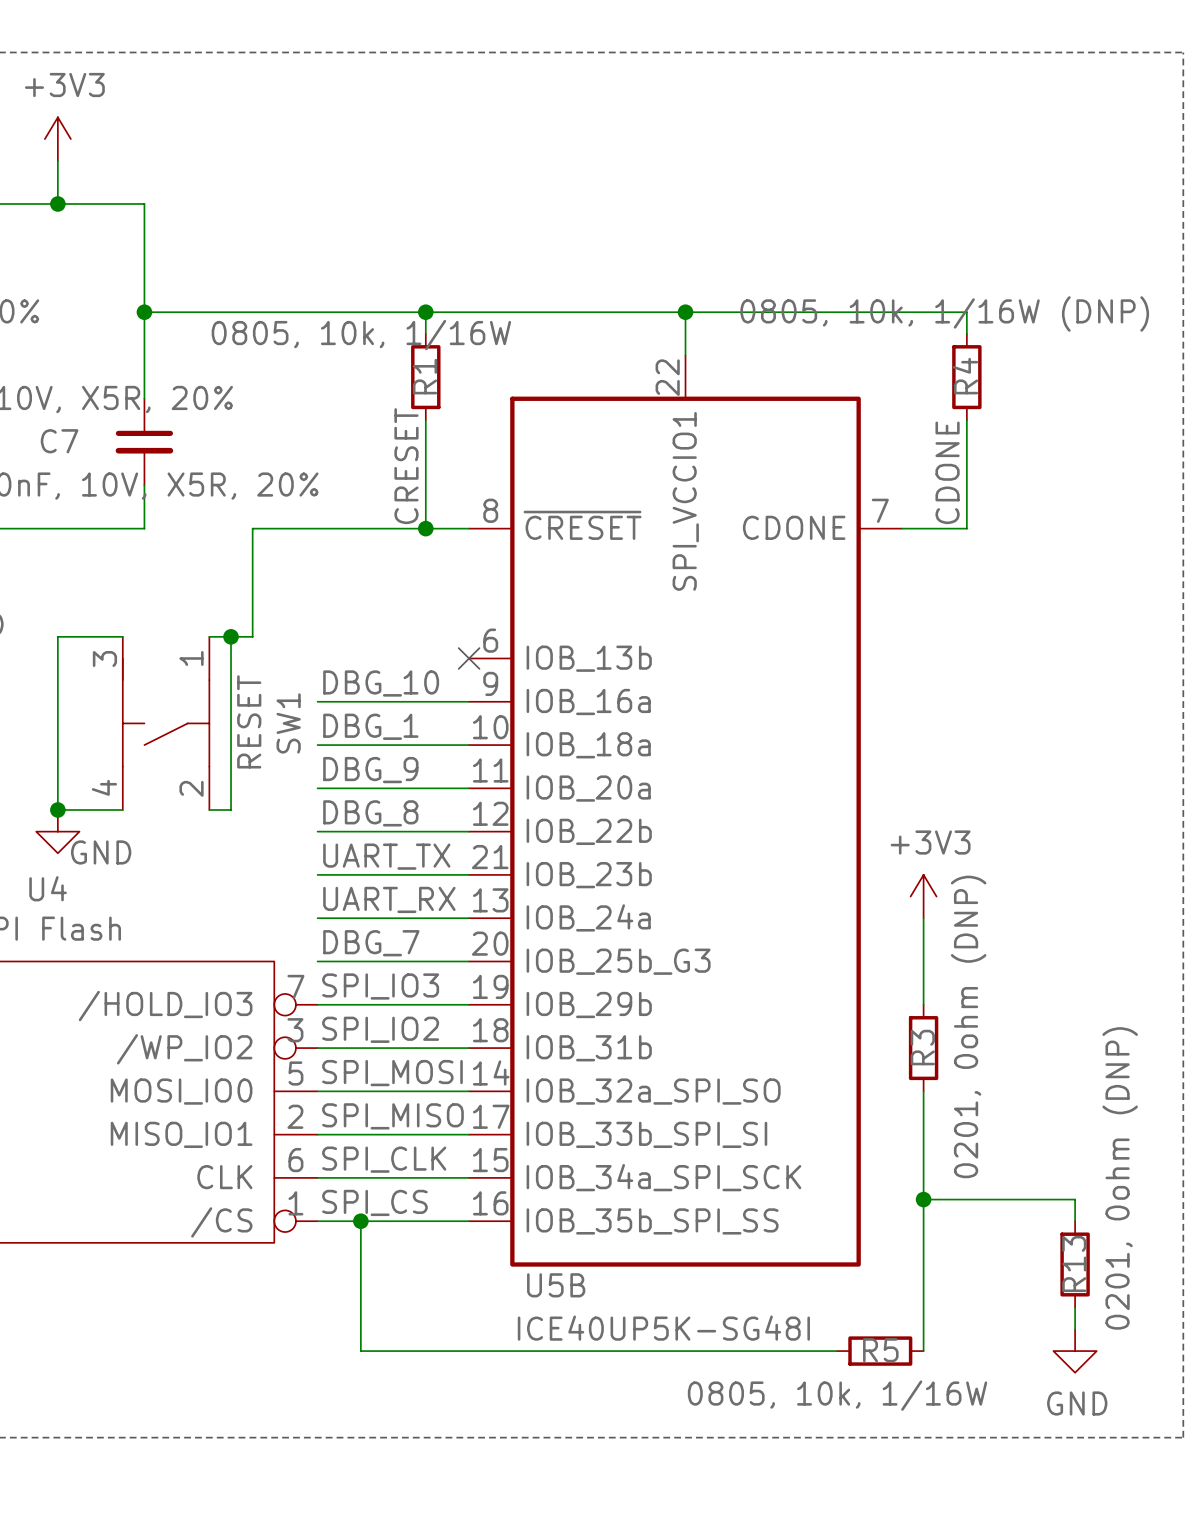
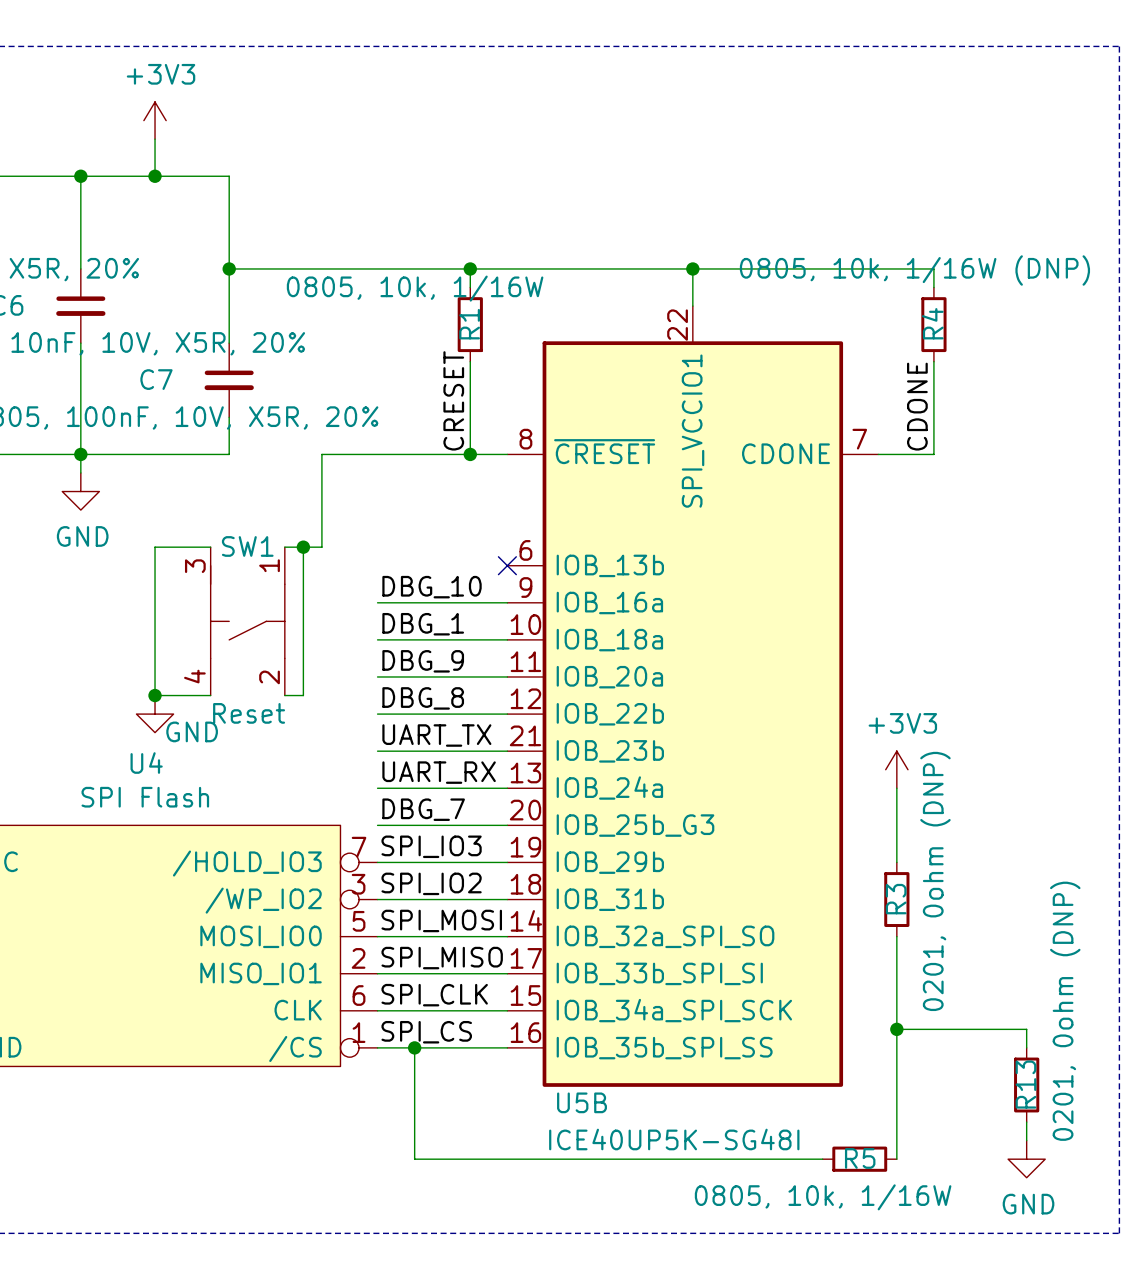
SW1 value: RESET (249, 721) -> Reset (249, 713)
SW1 name rotation: 0° (288, 723) -> 90° clockwise (247, 546)
SW1 name position: SW1 (288, 723) -> SW1 (247, 546)

